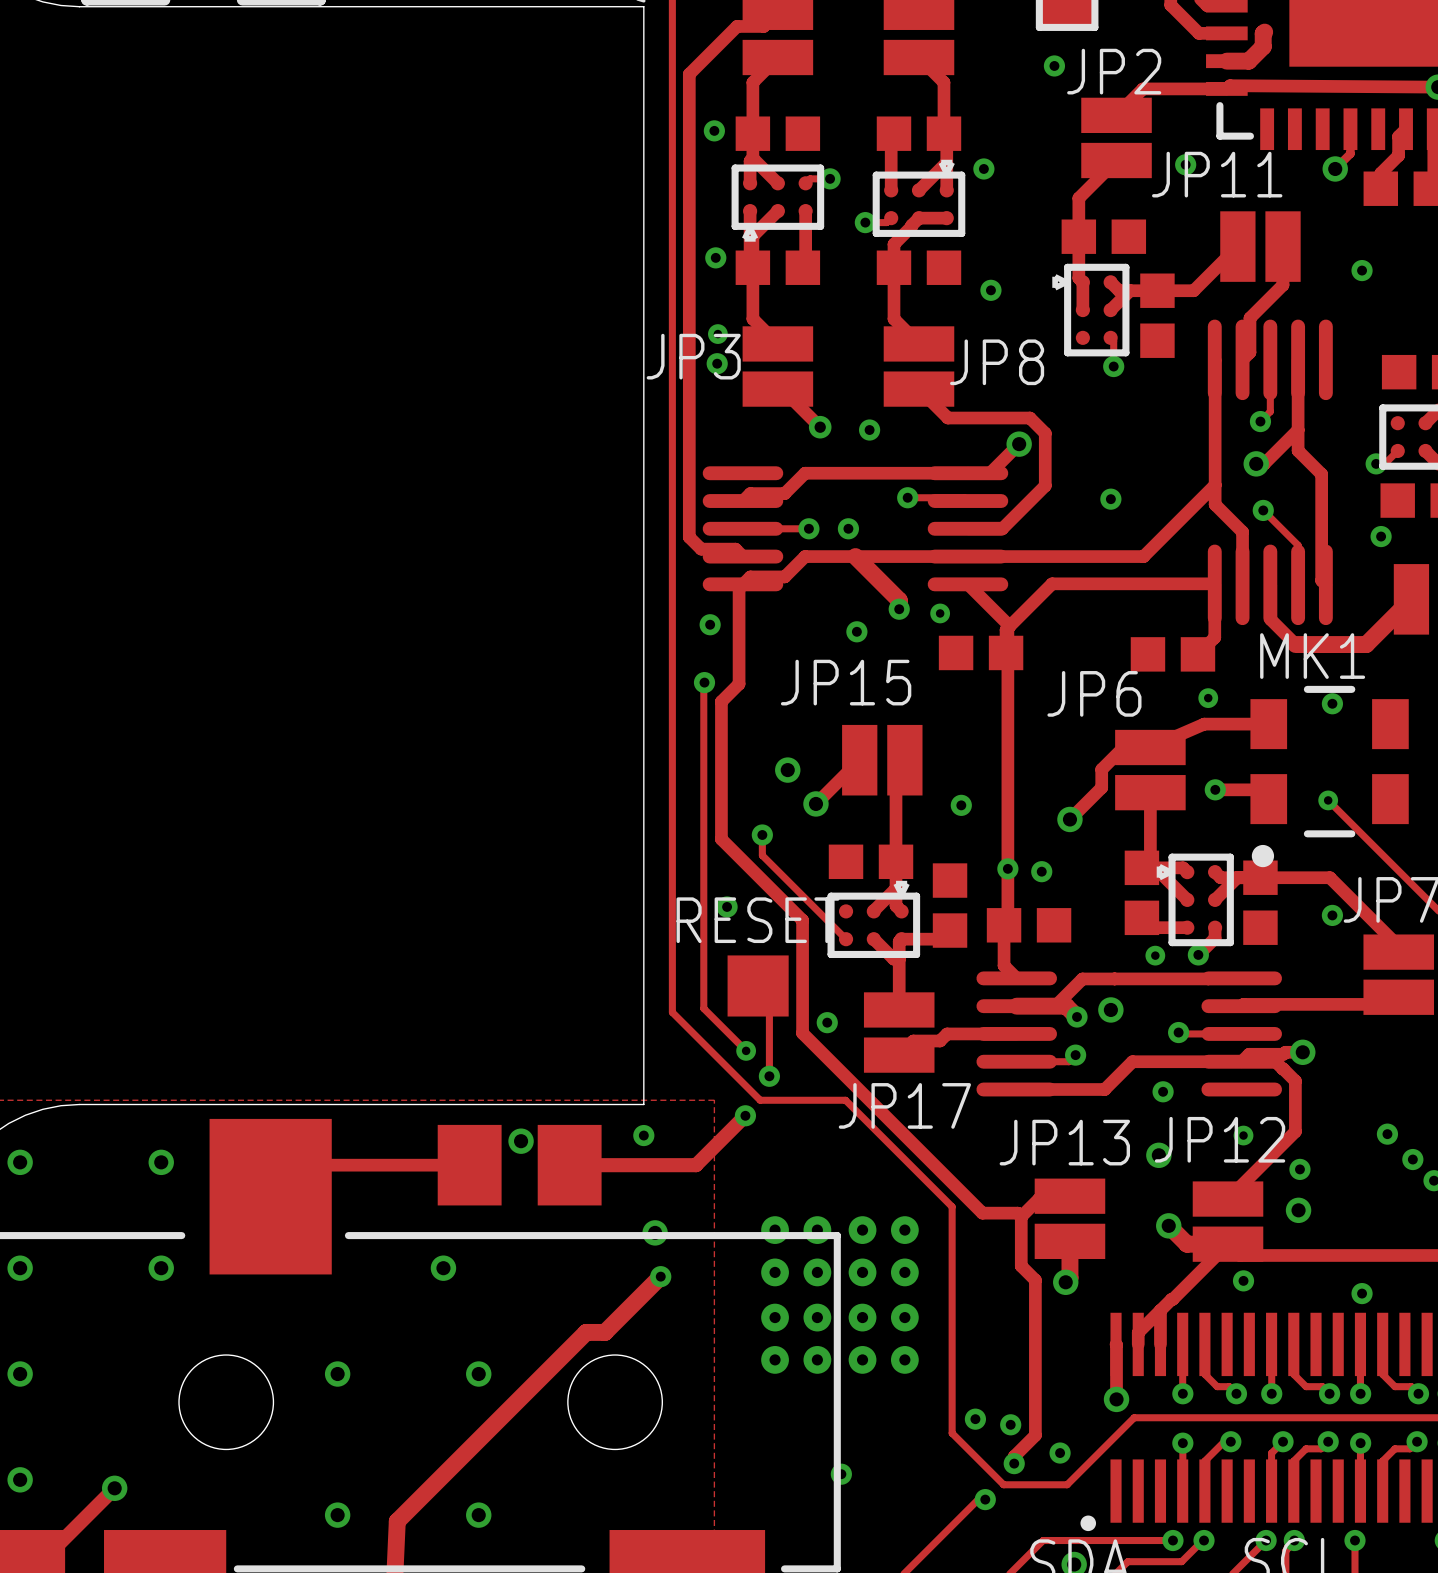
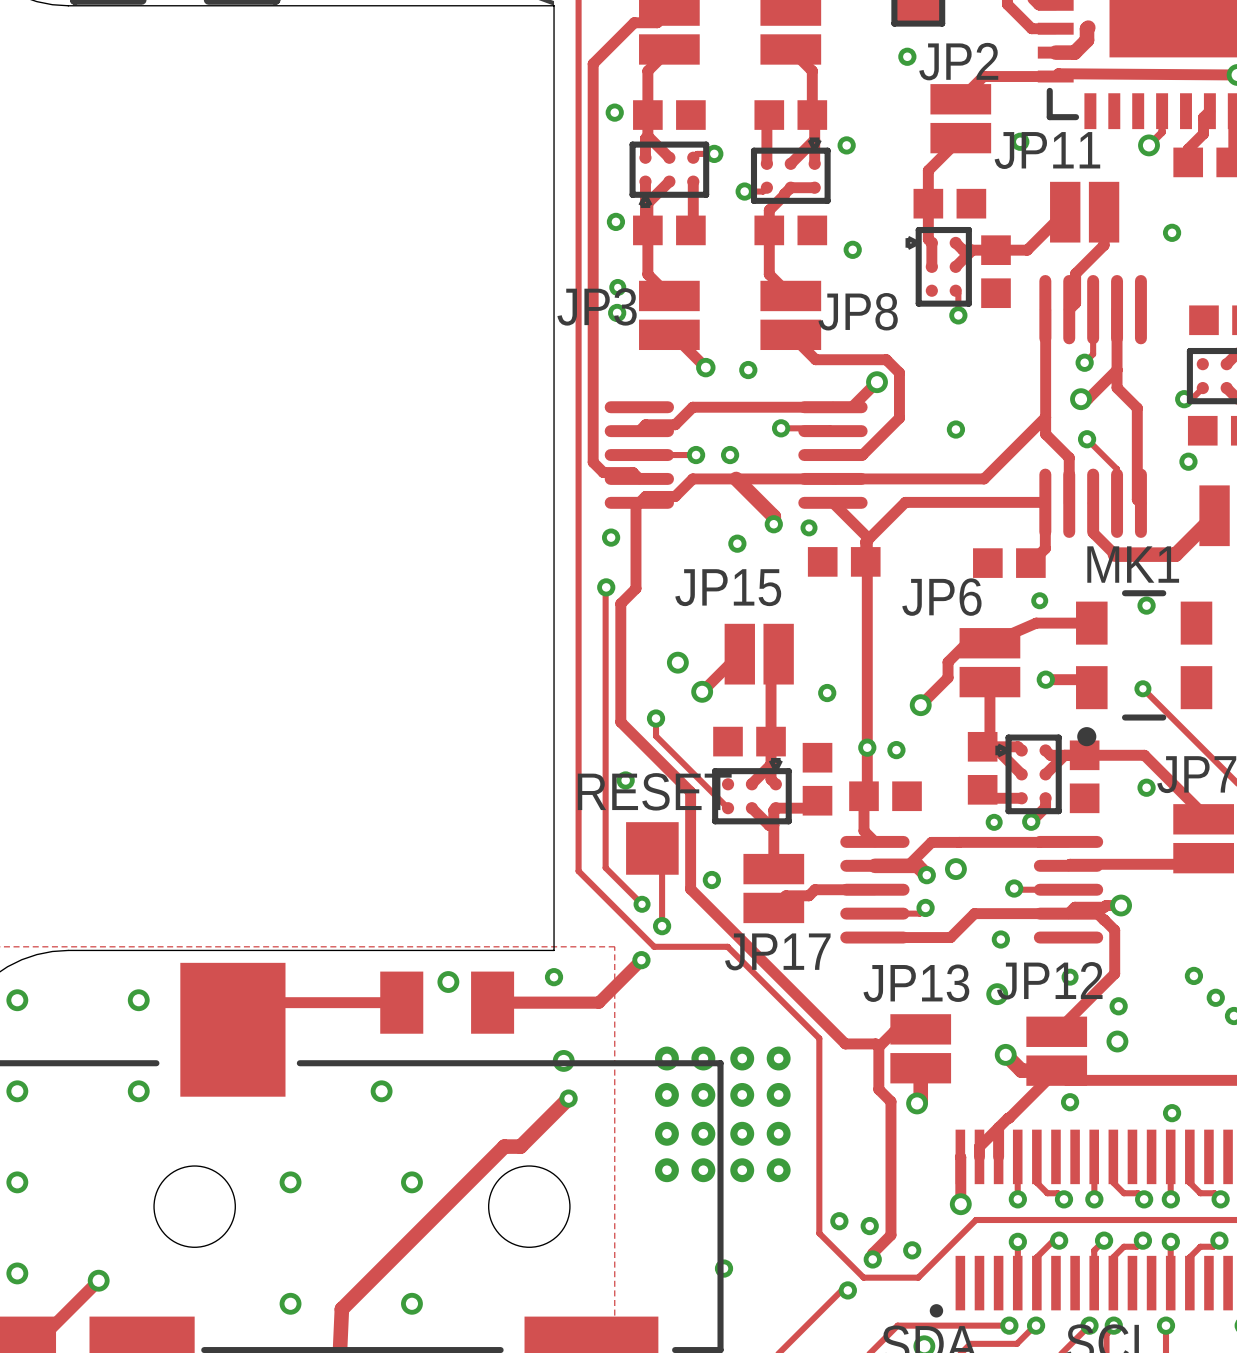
part footprint: [437, 1124, 602, 1206] -> [380, 971, 515, 1034]

